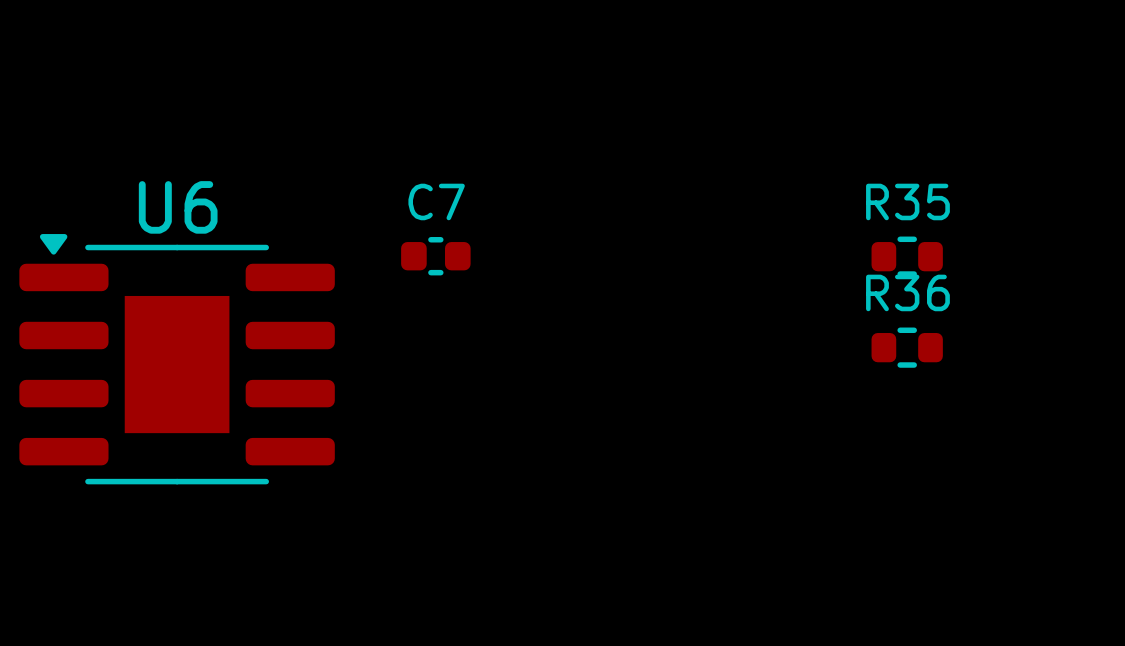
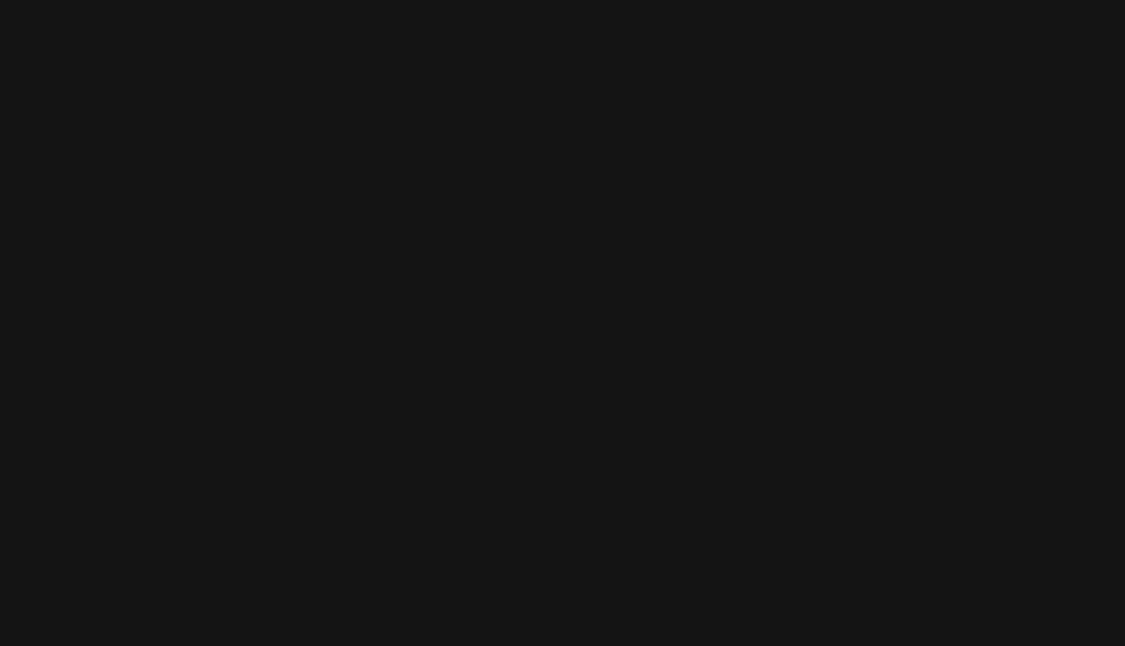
C7: (435, 256) -> none
R35: (907, 256) -> none
R36: (907, 347) -> none
U6: (177, 359) -> none

